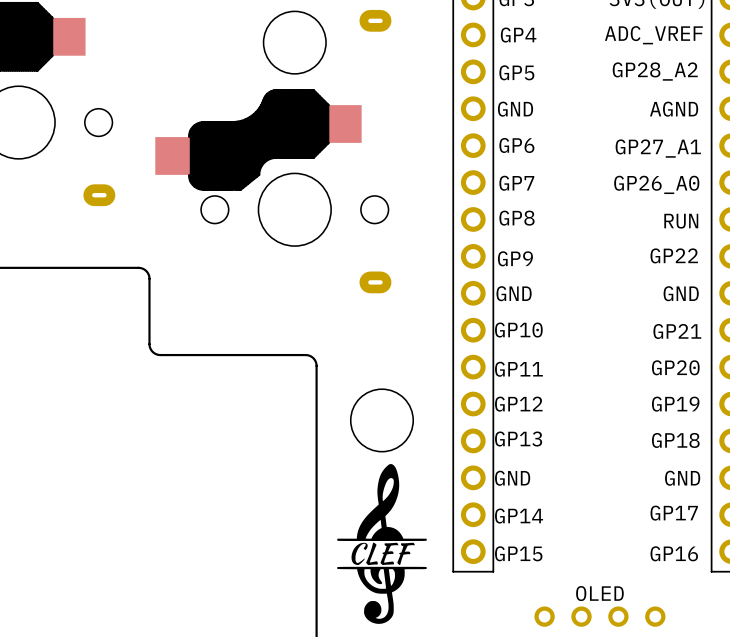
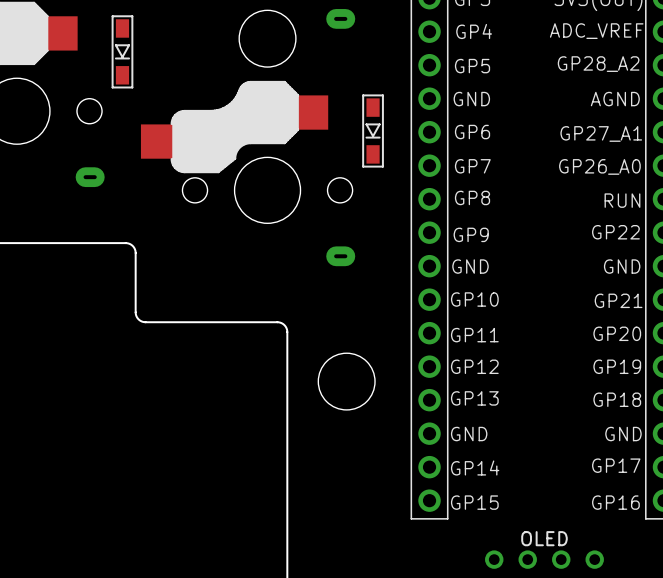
part: none -> (122, 51)
part: none -> (373, 131)
drawing: [337, 464, 427, 624] -> none

